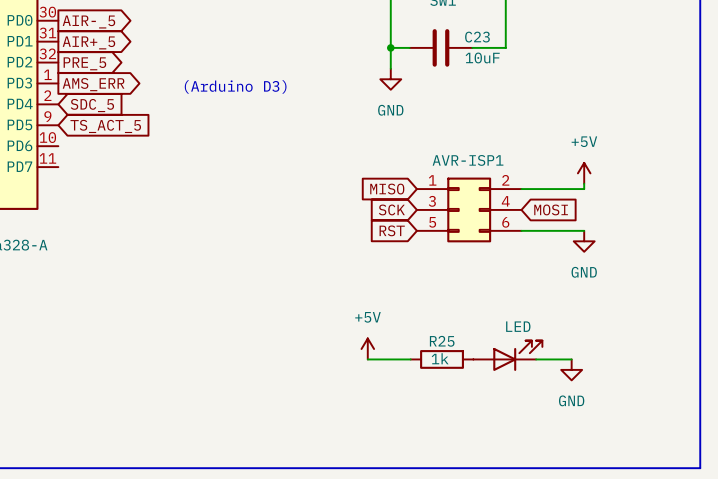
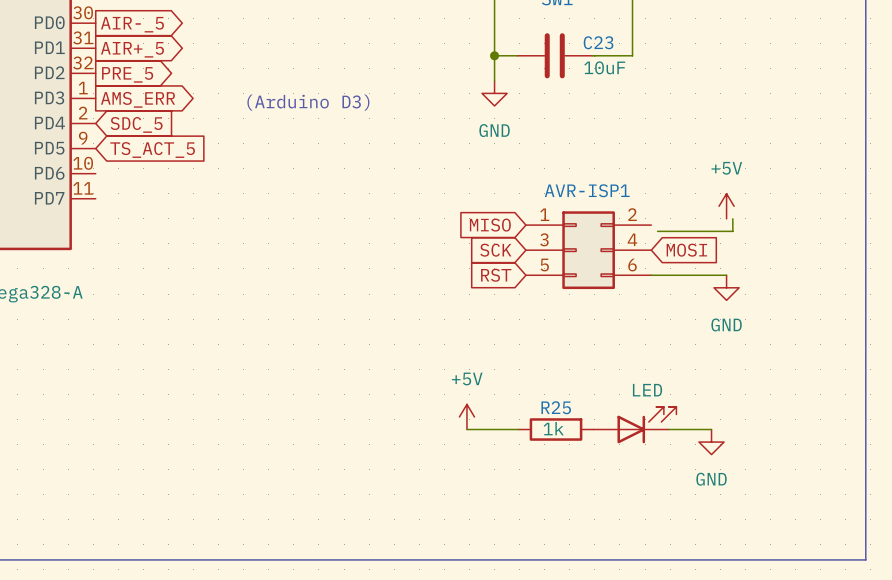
wire: (584, 183) (584, 189) (521, 189) -> none
wire: none -> (732, 218) (732, 231) (657, 231)

